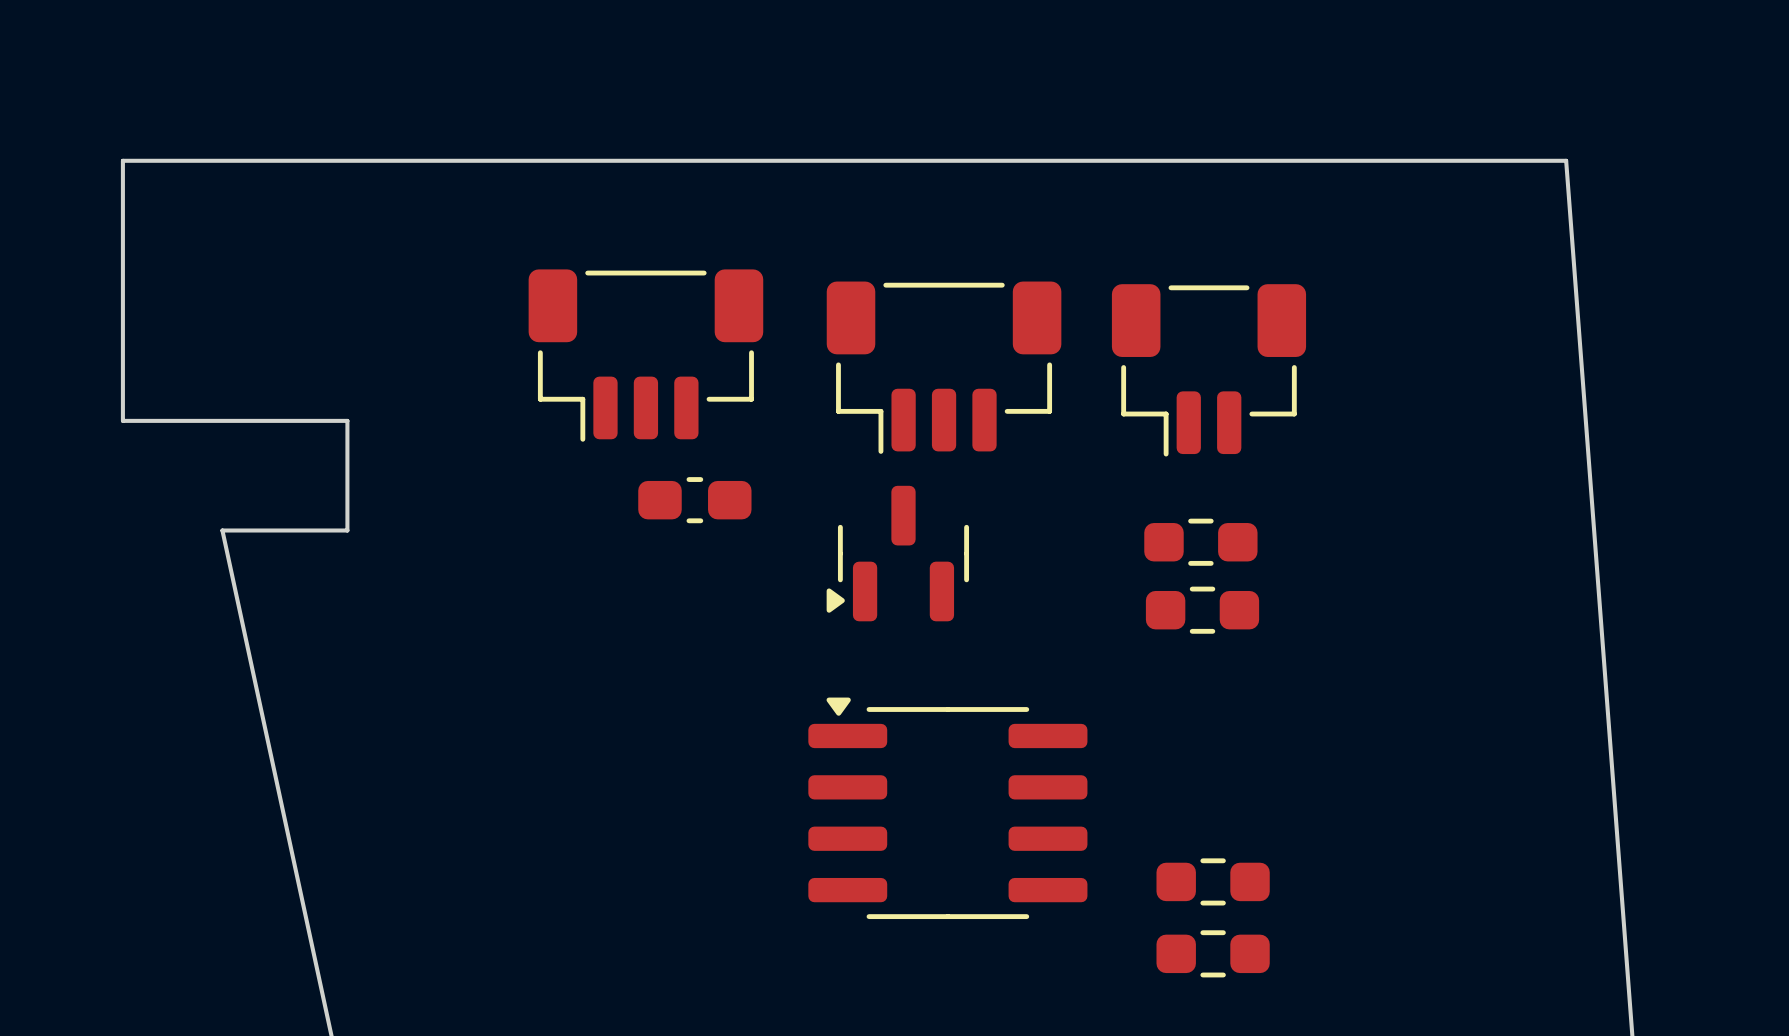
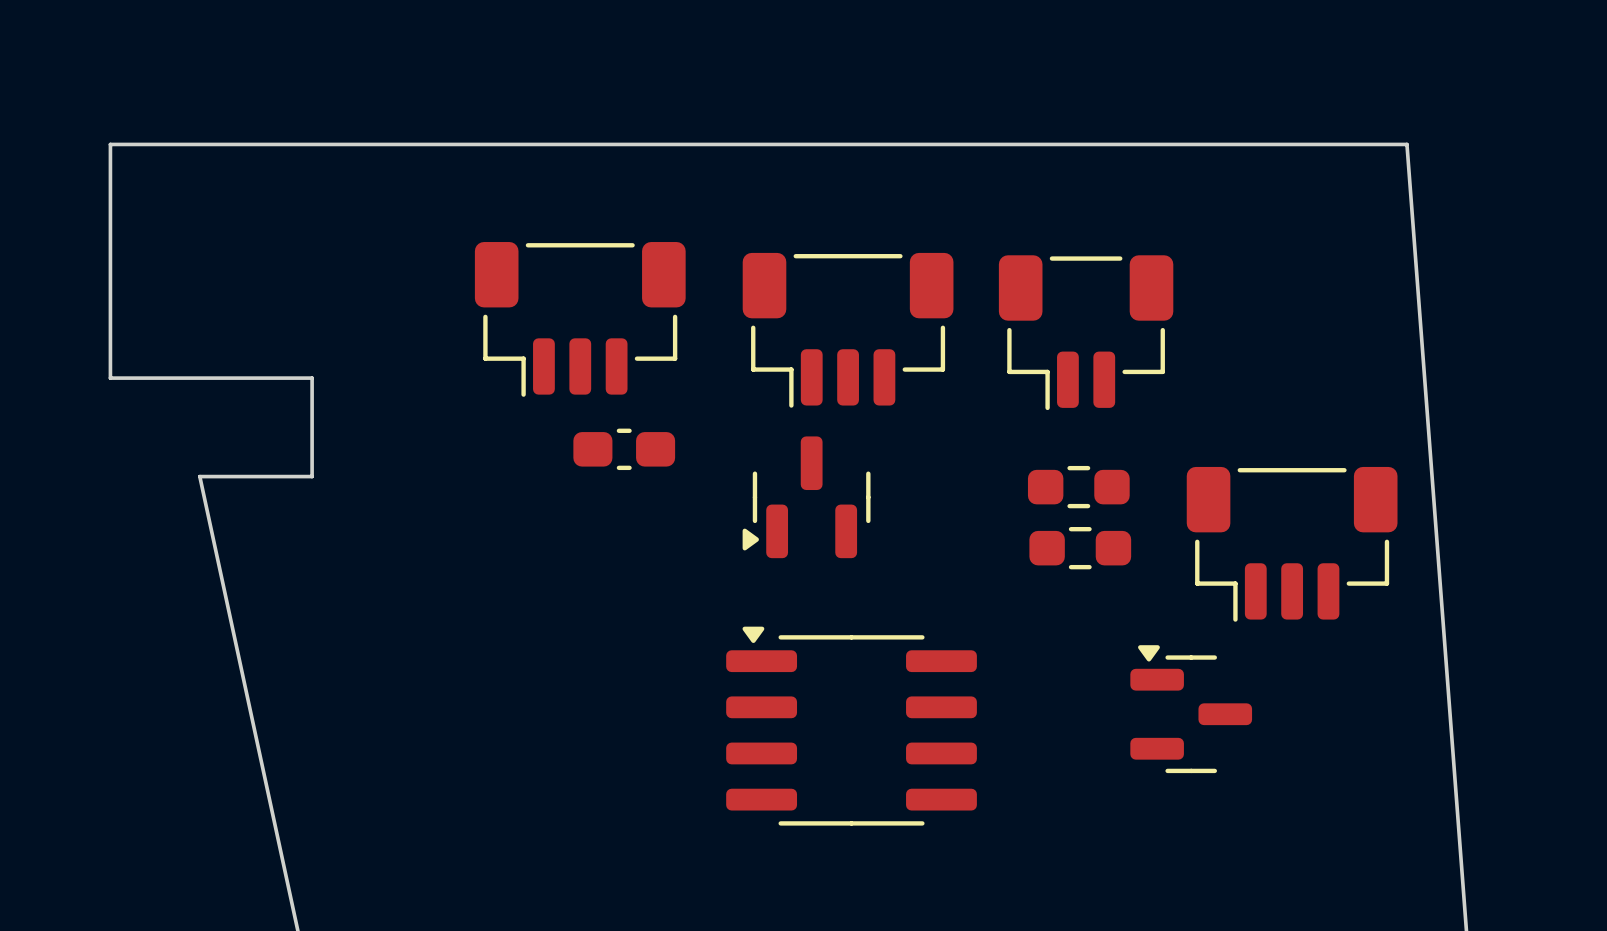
part: none -> (1292, 544)
part: none -> (1191, 709)
part: (1213, 881) -> none
part: (1213, 953) -> none

